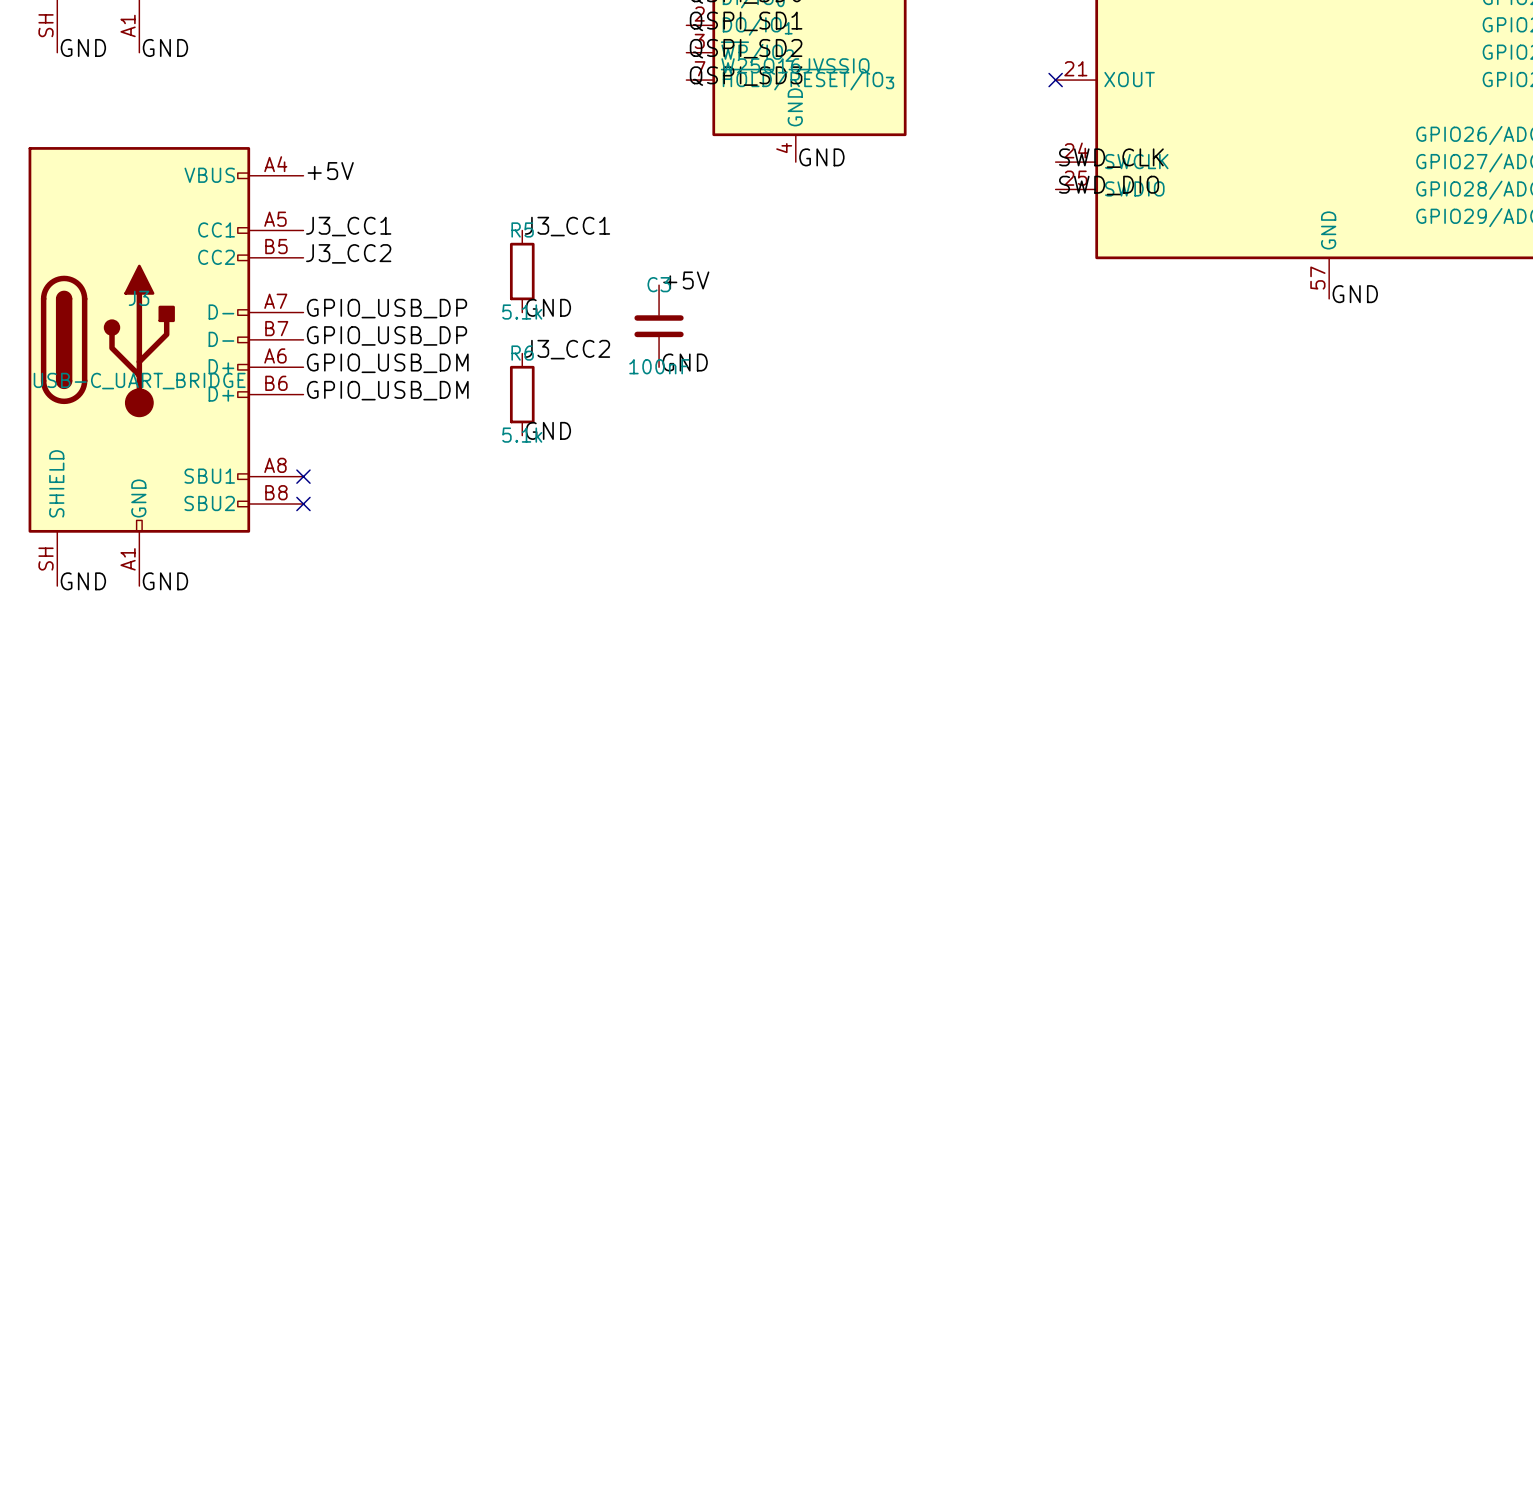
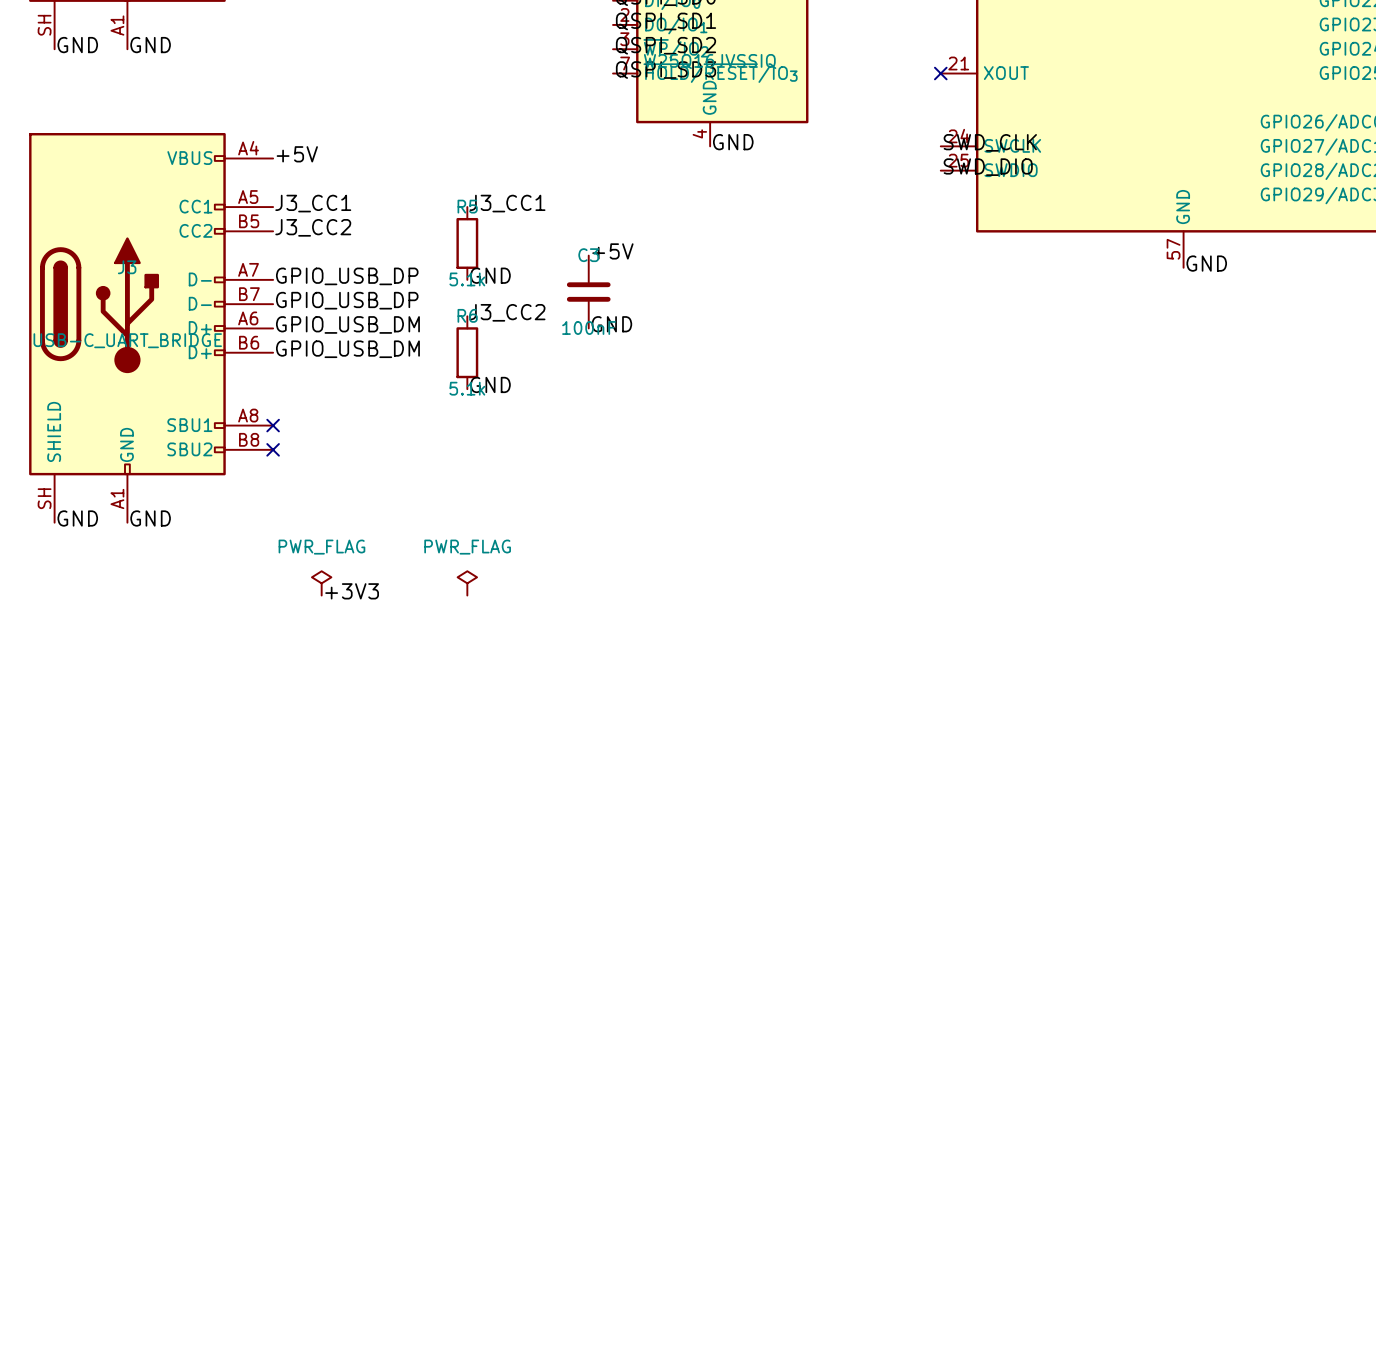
power symbol: none -> PWR_FLAG (321, 583)
power symbol: none -> PWR_FLAG (467, 583)
label: none -> +3V3 (352, 591)

